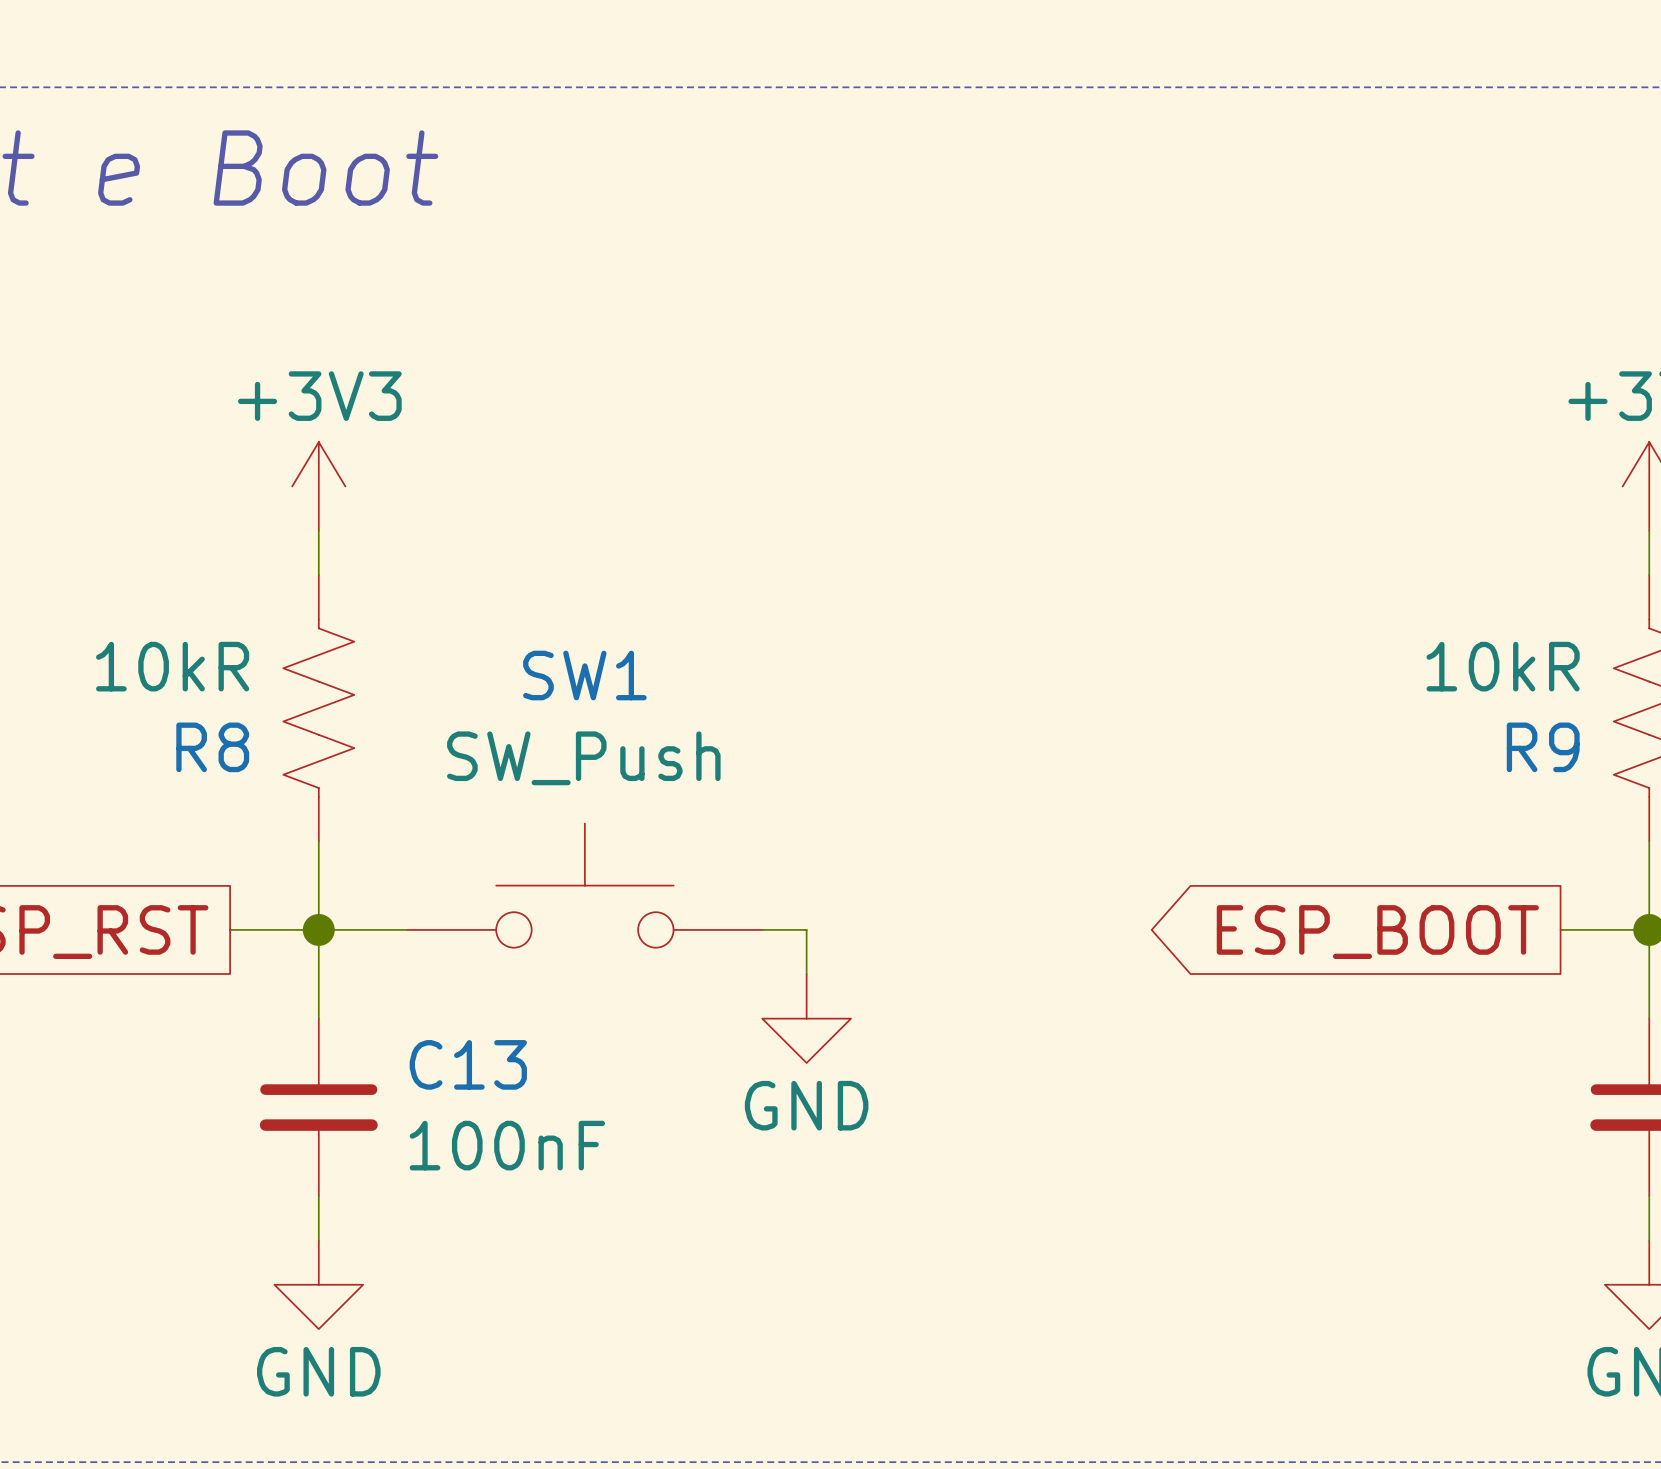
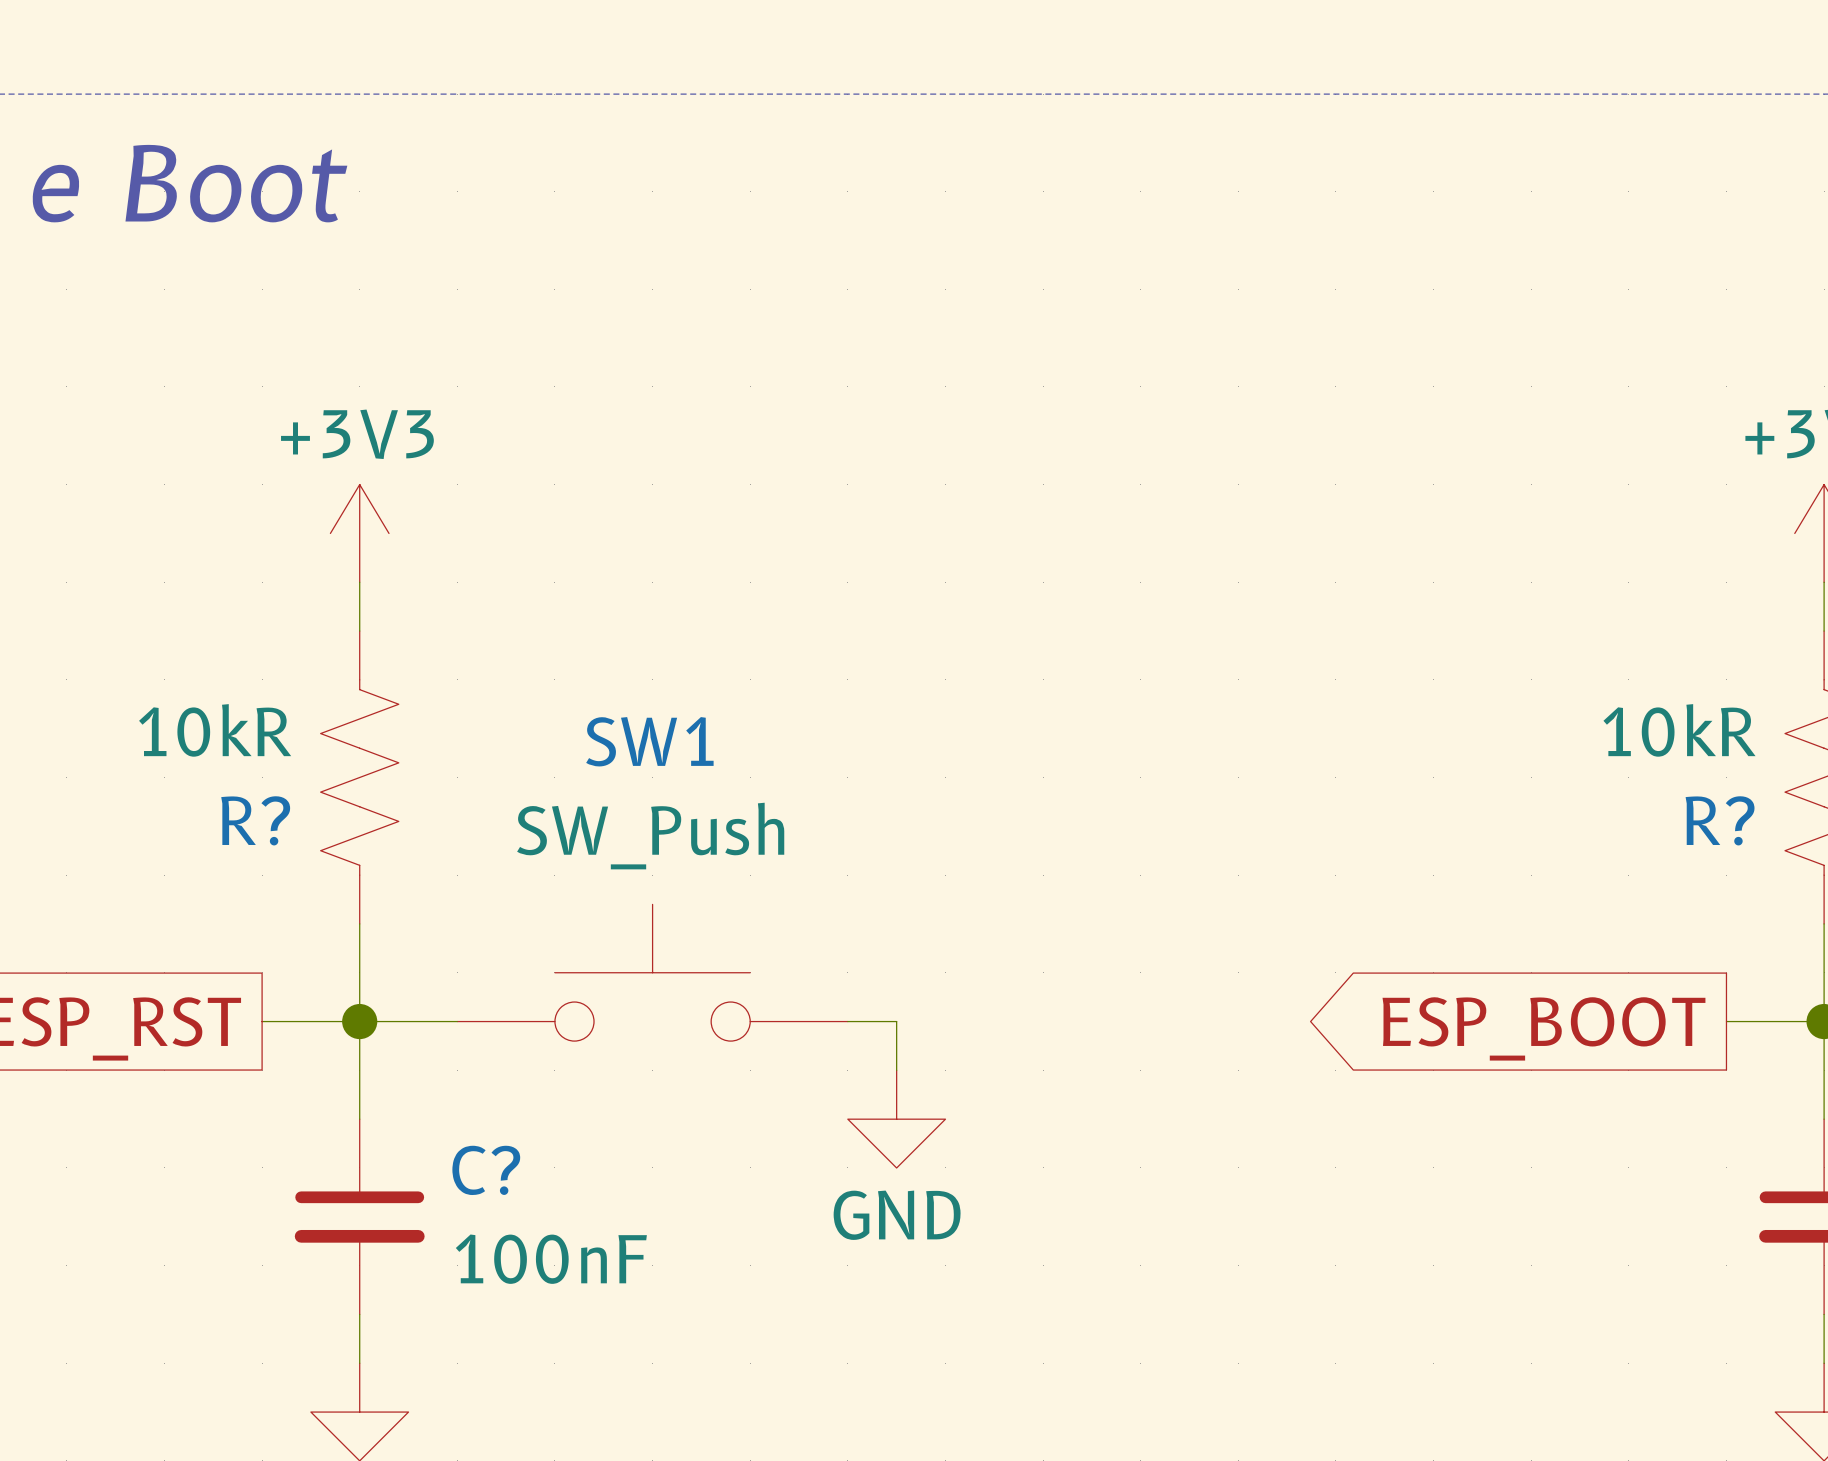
R8 name: R8 (212, 747) -> R? (255, 820)
R9 name: R9 (1543, 747) -> R? (1720, 820)
C13 name: C13 (468, 1064) -> C? (486, 1170)

